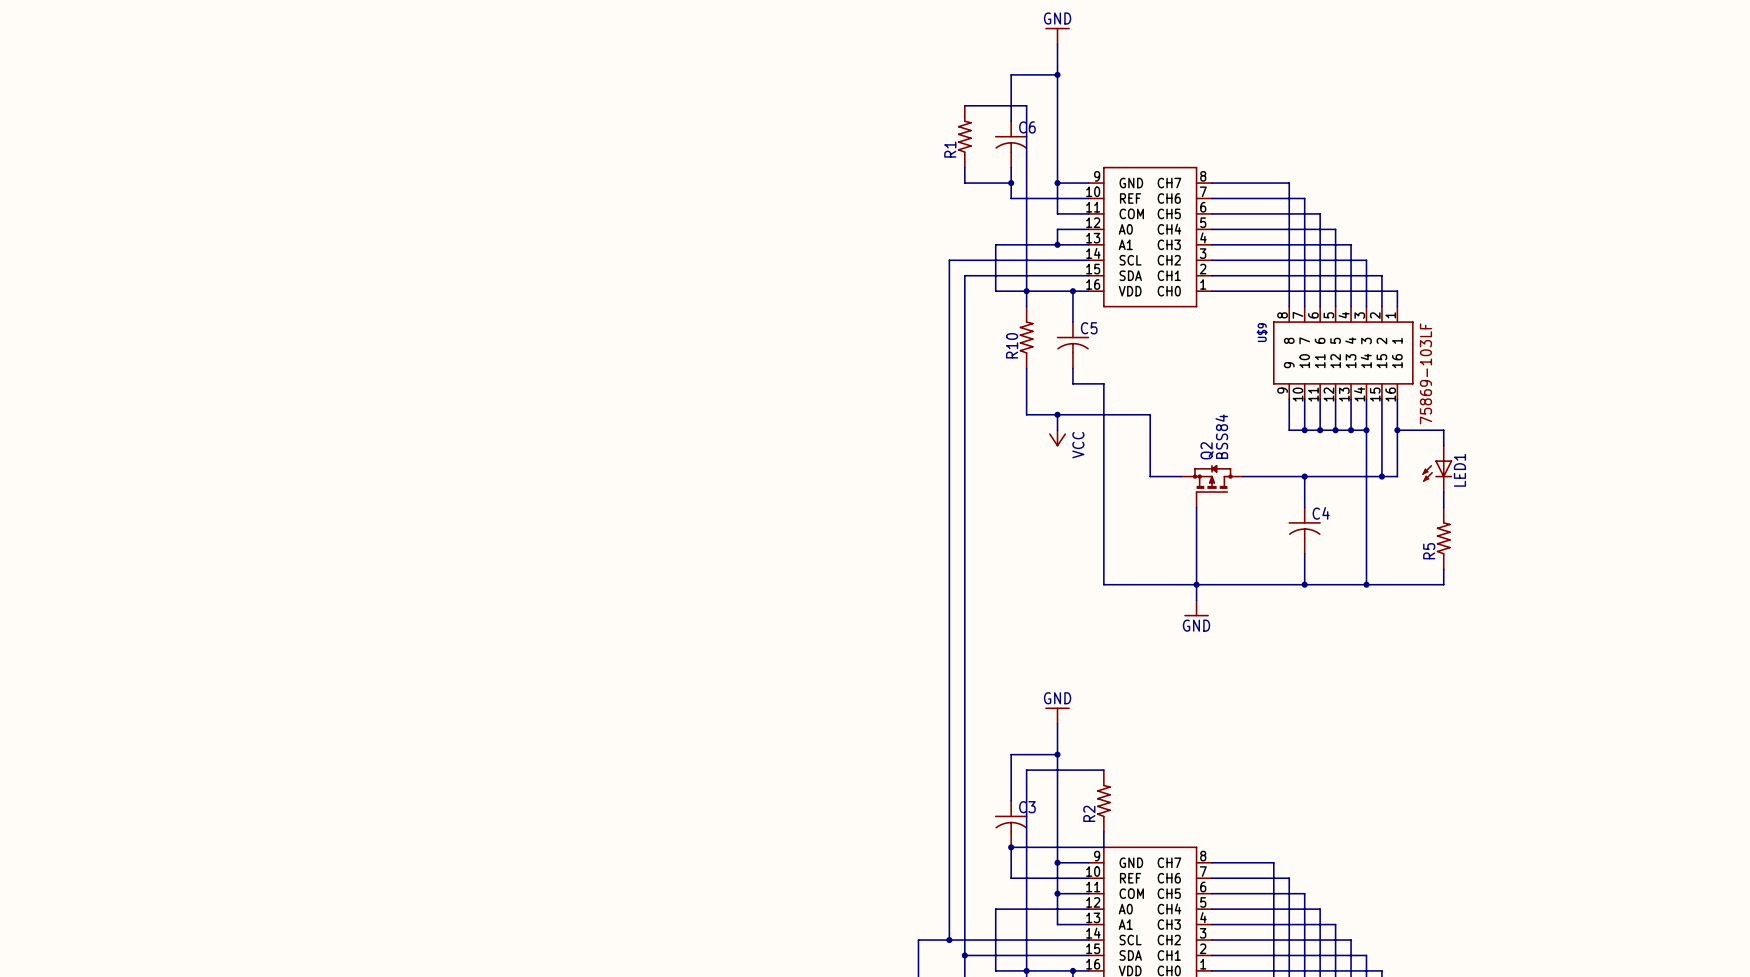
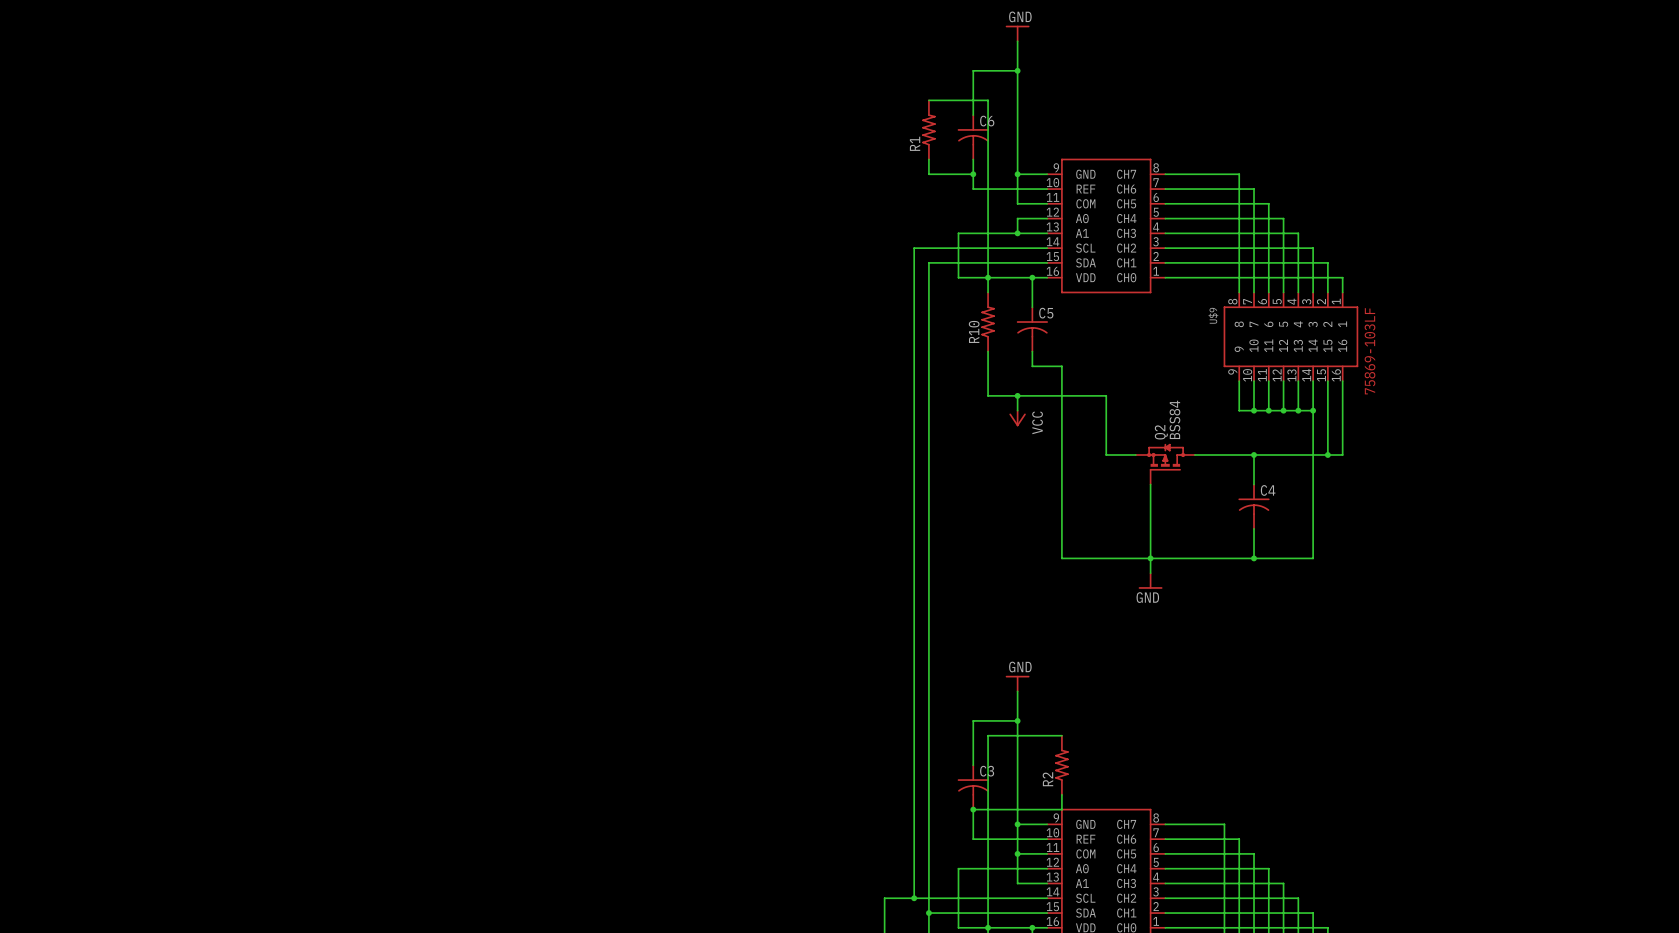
wire: (1397, 430) (1443, 430) (1443, 445) -> none
junction: (1397, 430) -> none
LED1: (1437, 468) -> none
wire: (1443, 492) (1443, 507) -> none
R5: (1443, 538) -> none
wire: (1443, 569) (1443, 584) (1366, 584) -> none
junction: (1366, 584) -> none

